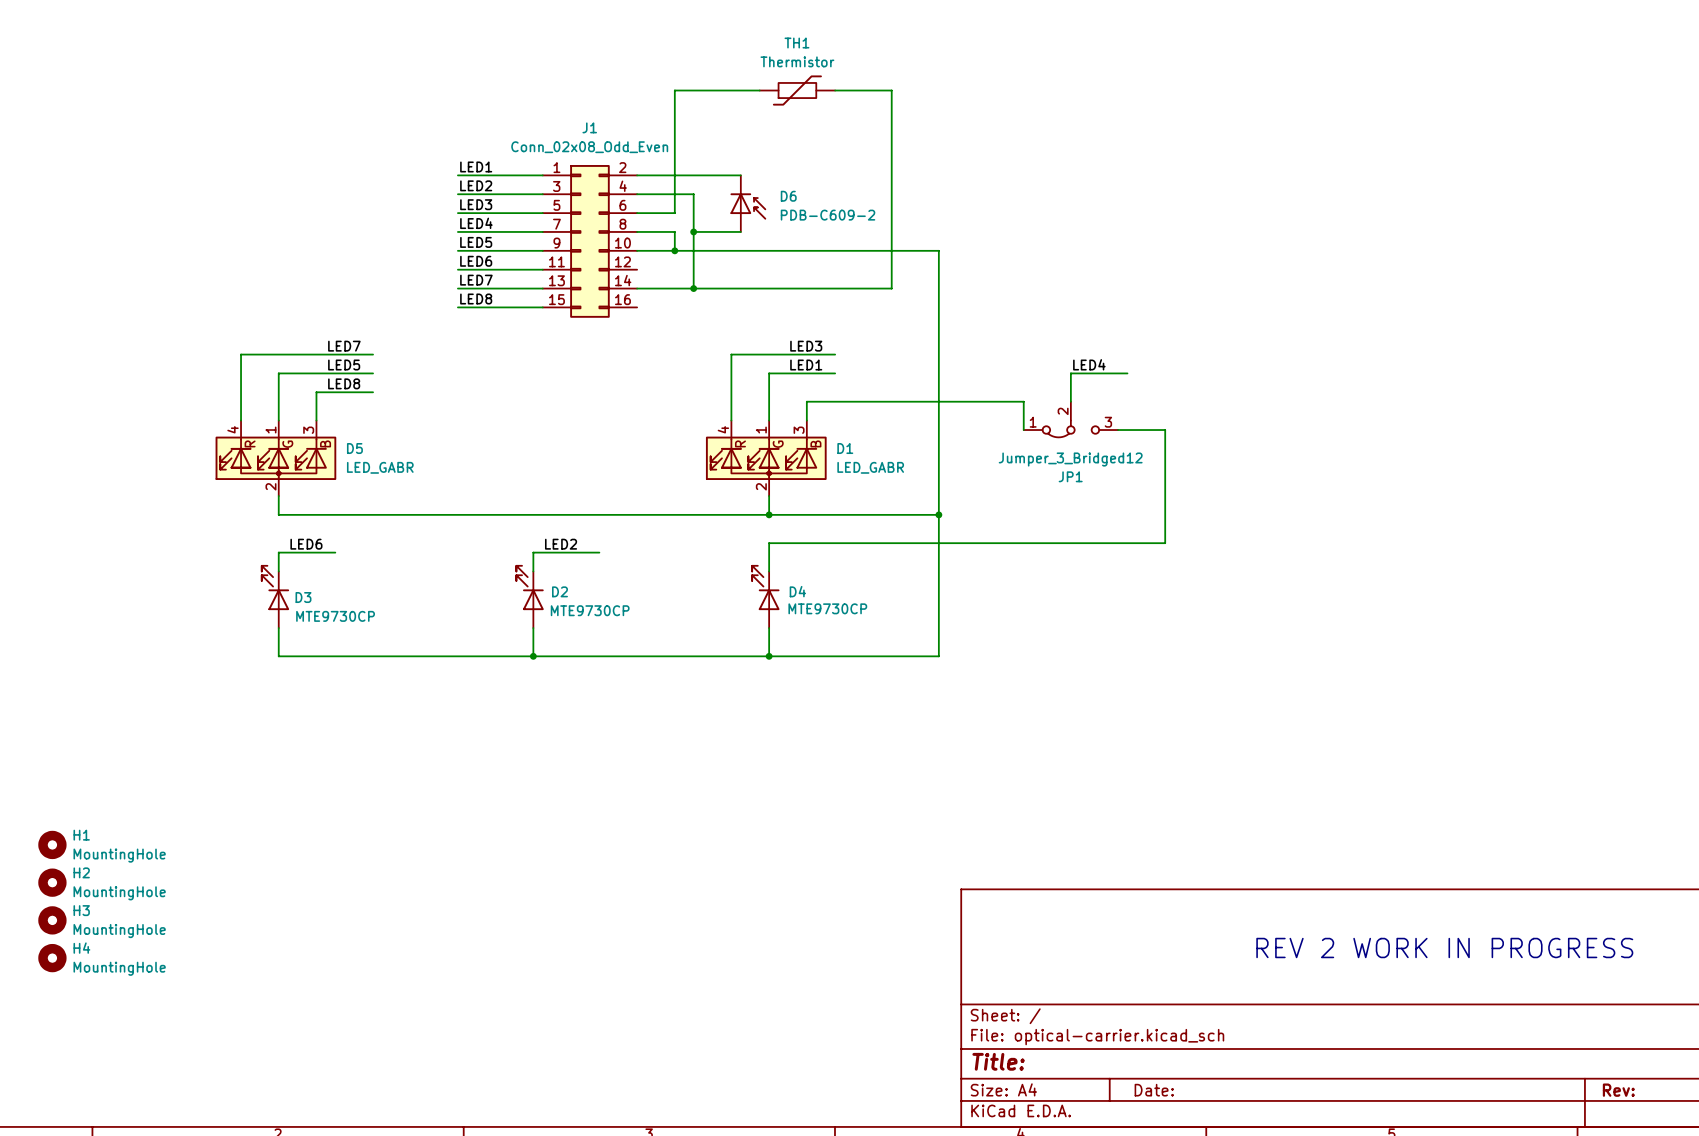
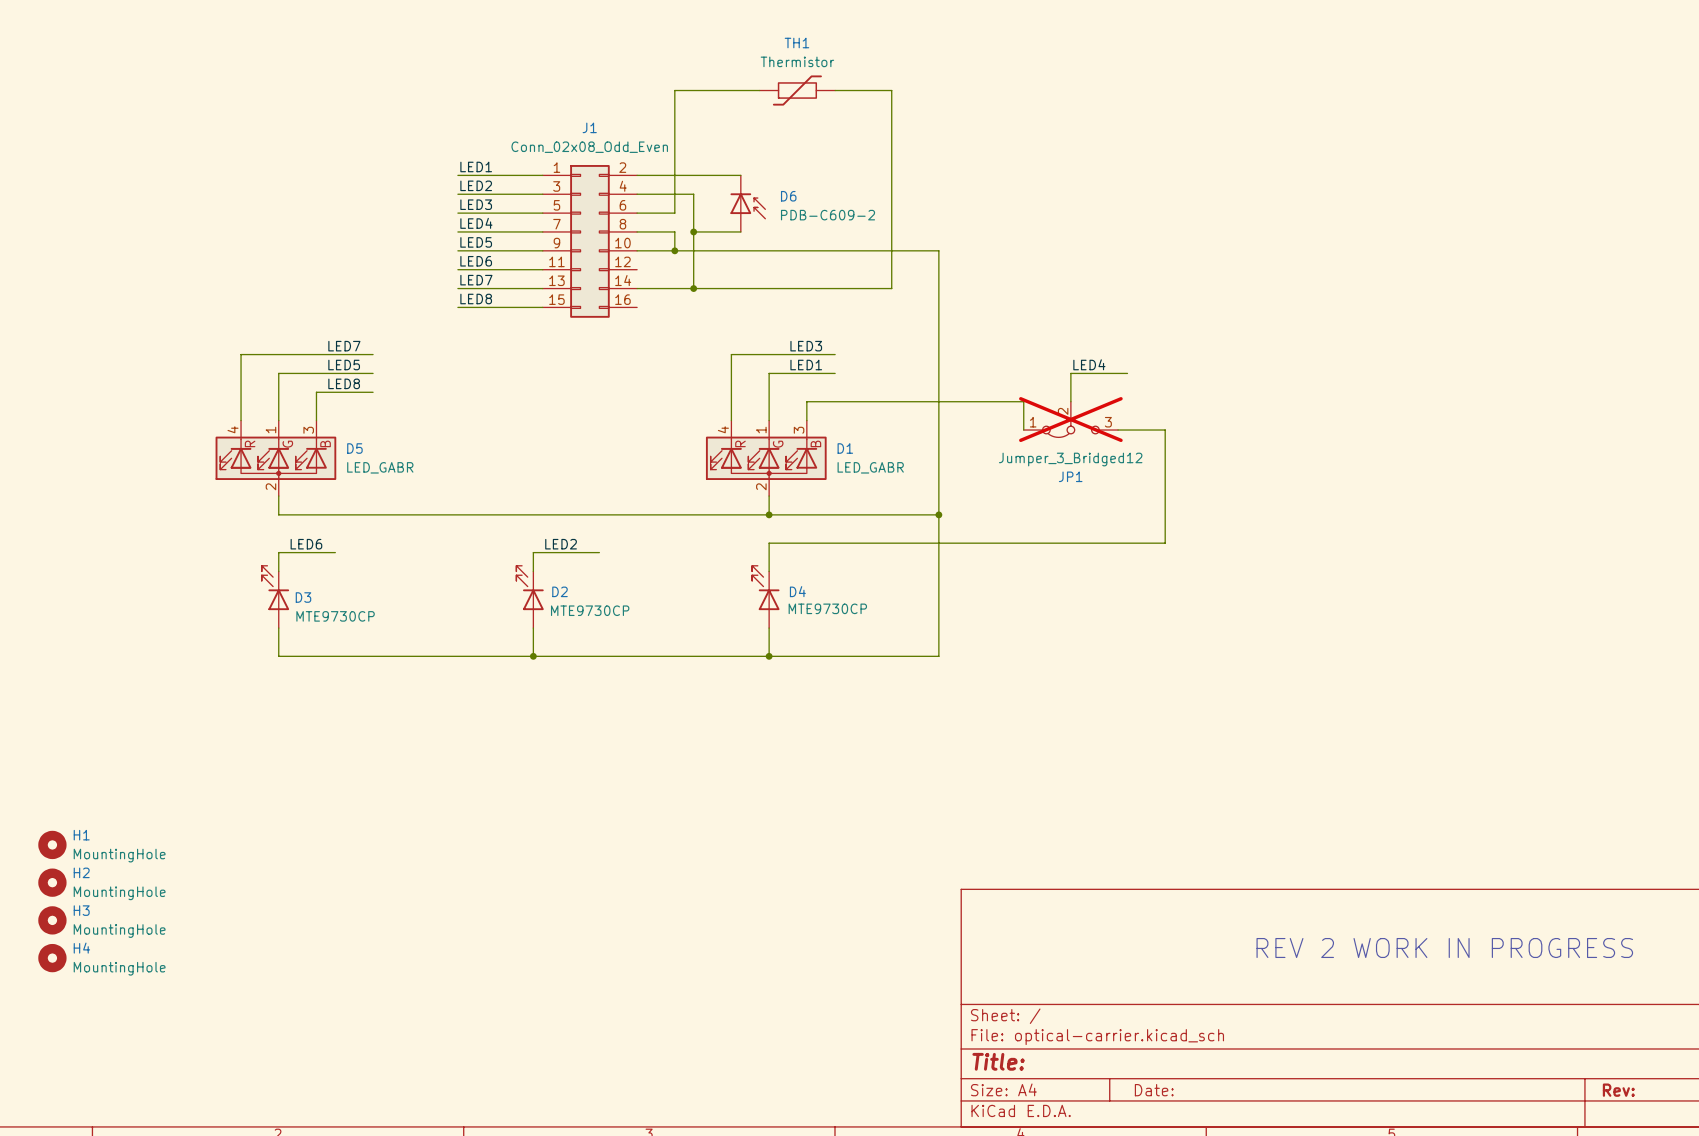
JP1 do-not-place cross: none -> (1070, 419)

